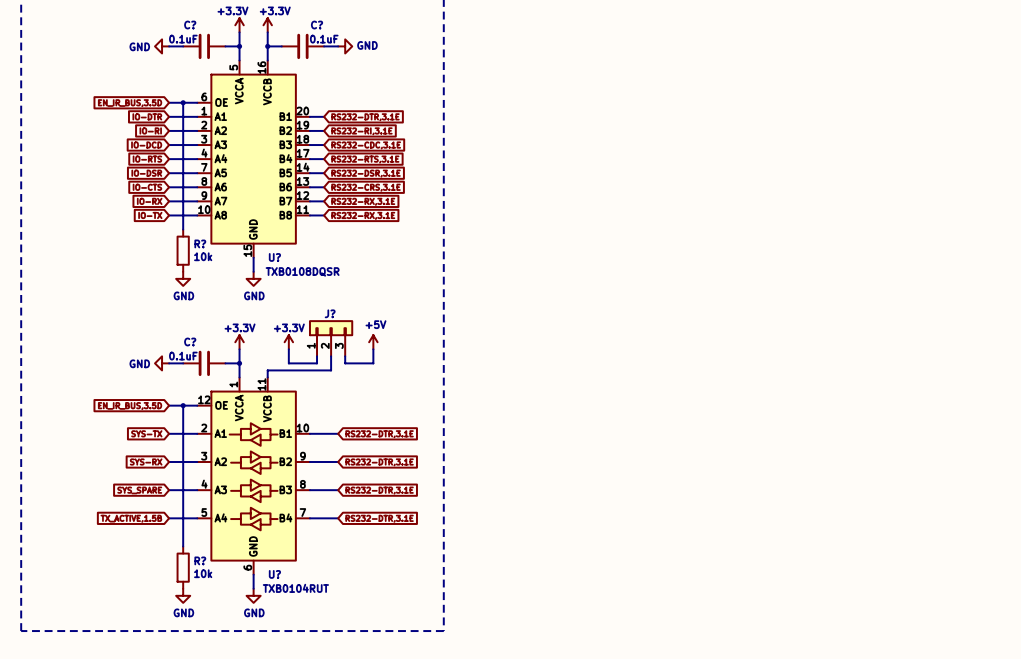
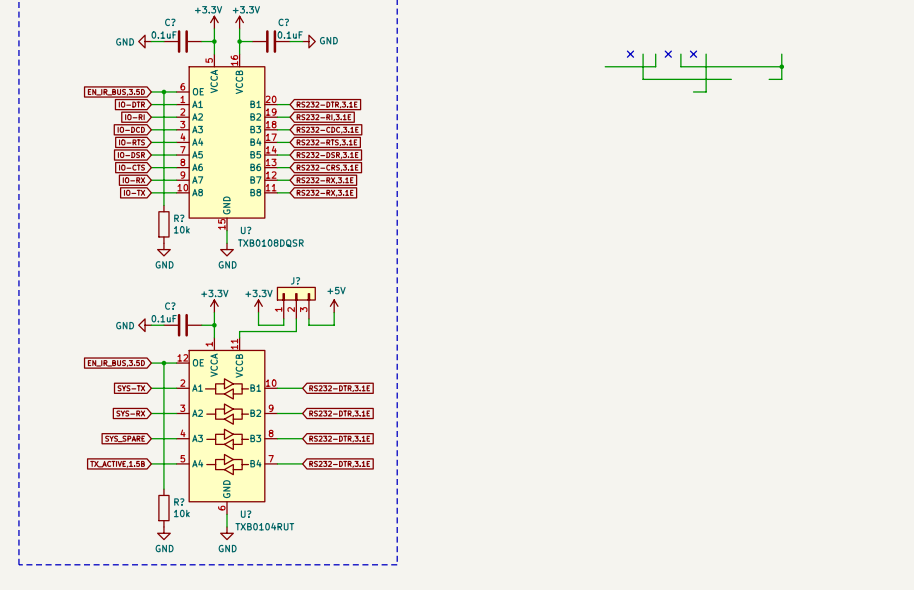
no-connect mark: none -> (630, 54)
wire: none -> (643, 54) (643, 79) (731, 79)
wire: none -> (655, 54) (655, 66) (605, 66)
no-connect mark: none -> (668, 54)
wire: none -> (680, 54) (680, 66) (781, 66)
no-connect mark: none -> (693, 54)
wire: none -> (706, 54) (706, 91) (693, 91)
wire: none -> (781, 54) (781, 79) (769, 79)
junction: none -> (781, 66)

